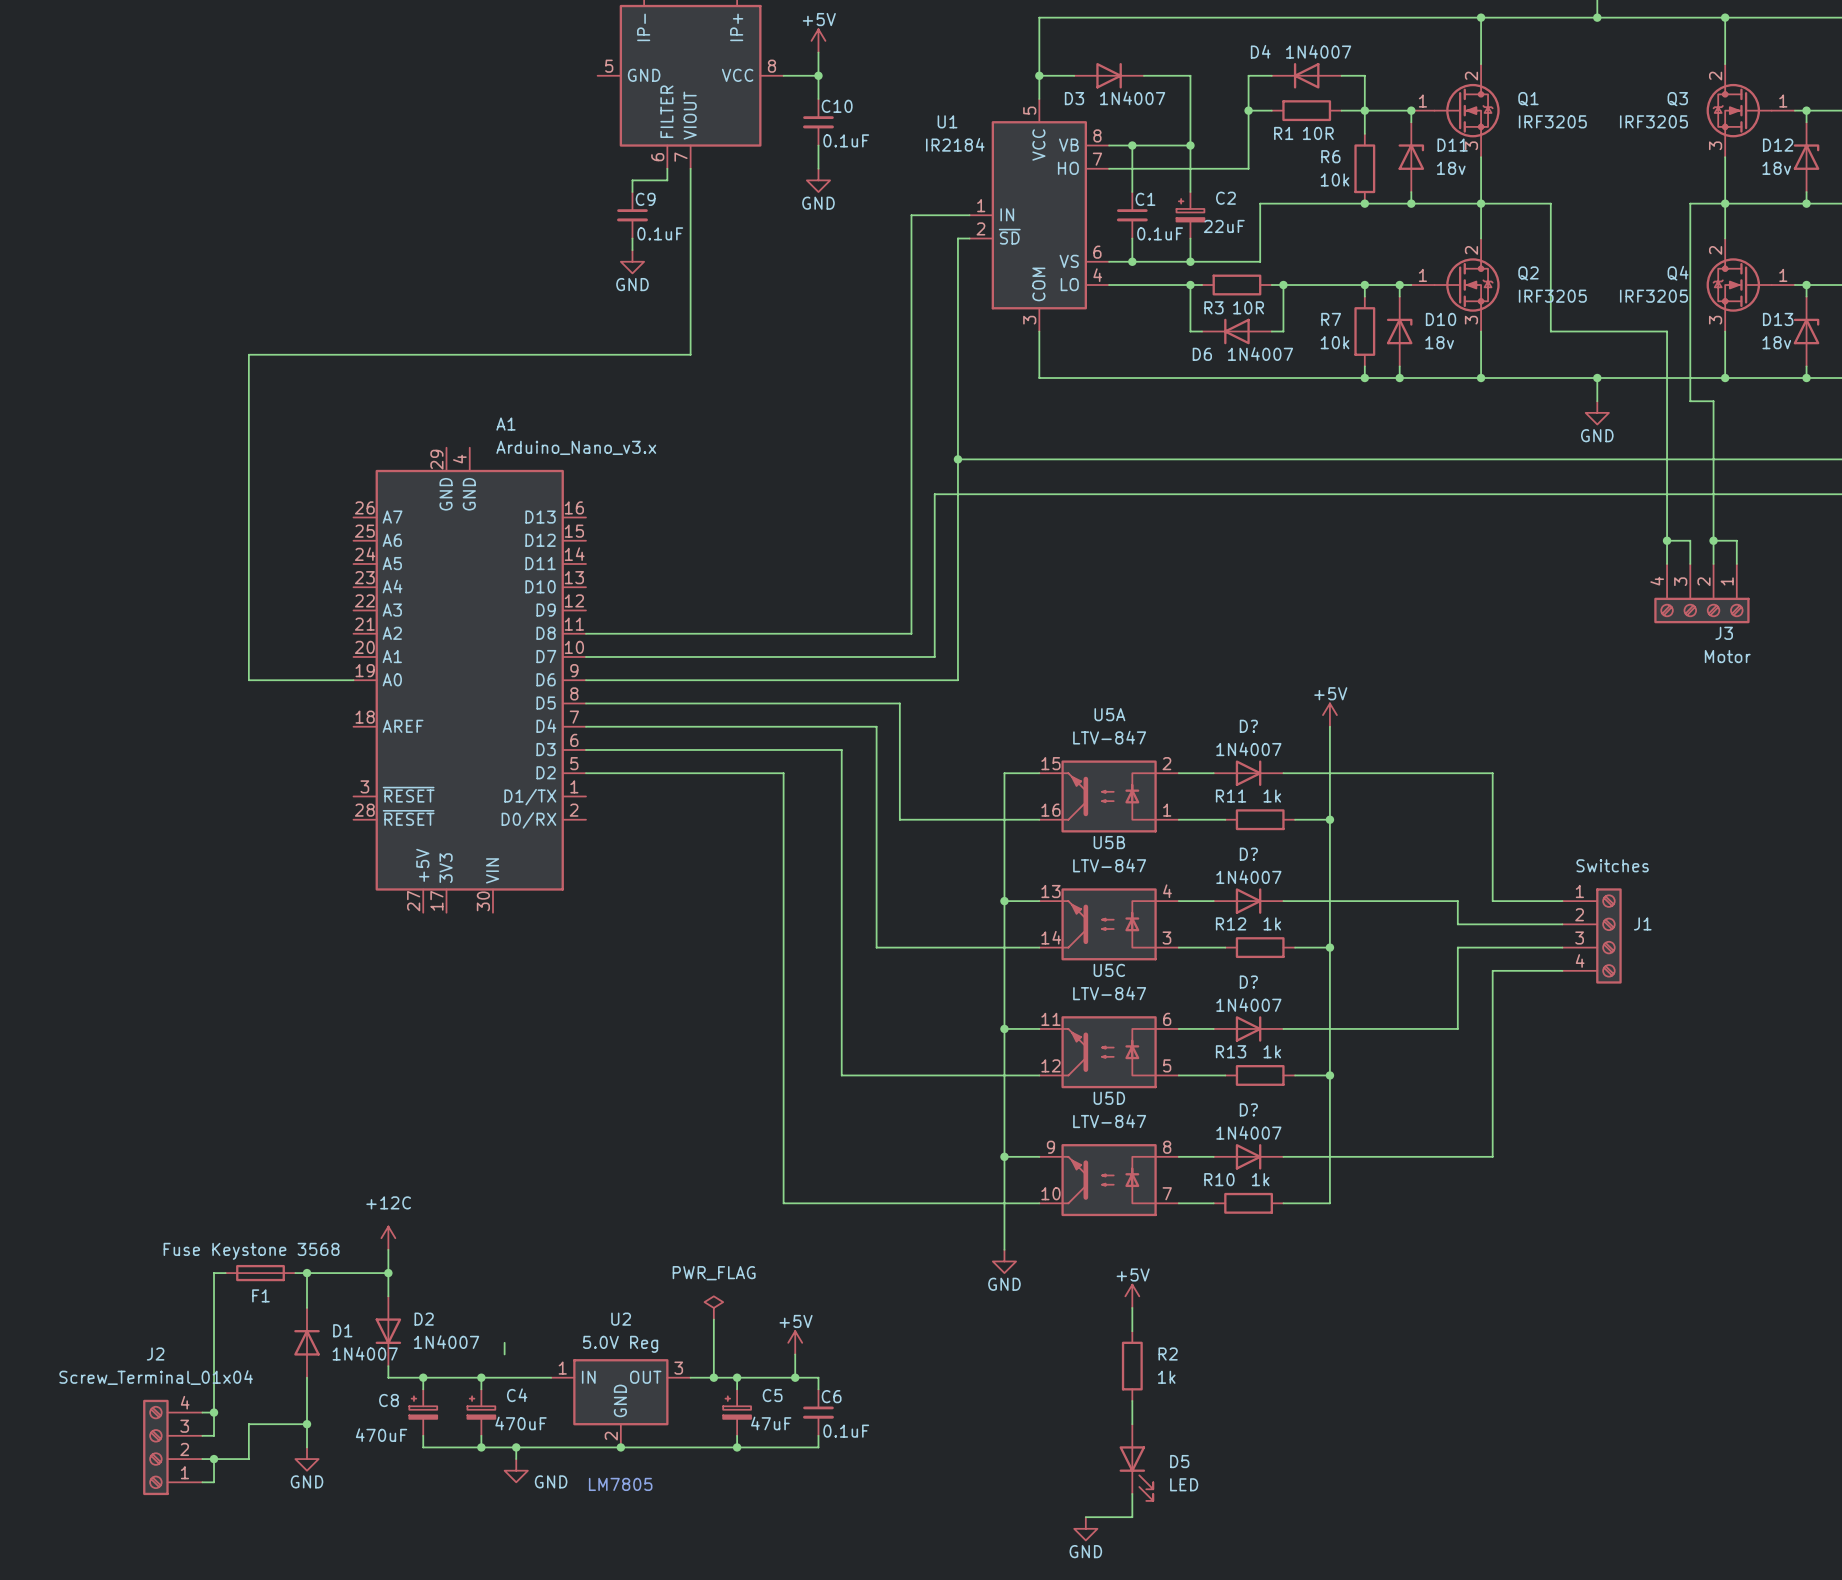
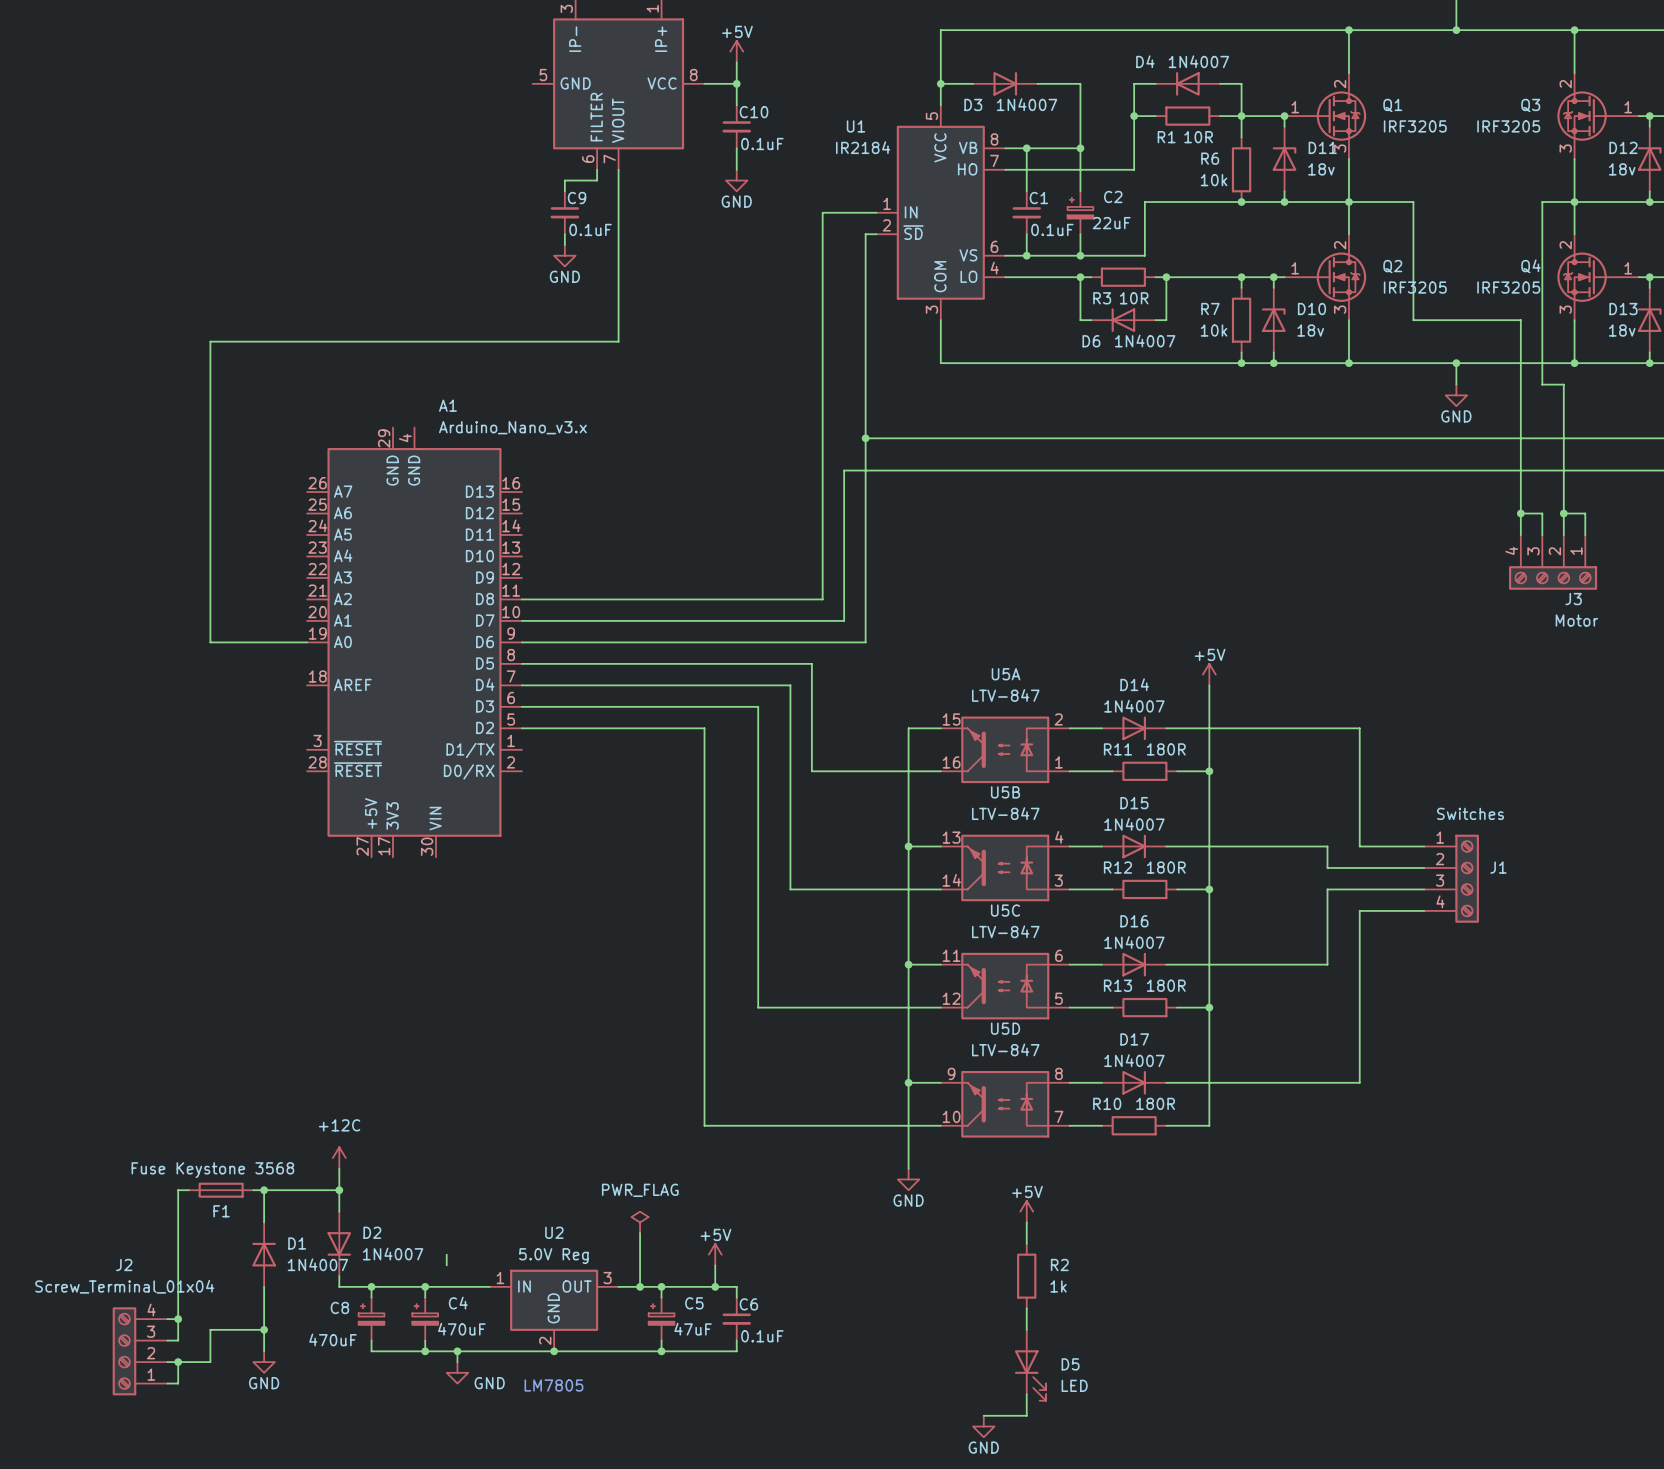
D? name: D? (1248, 726) -> D14 (1134, 684)
R11 value: 1k (1272, 796) -> 180R (1166, 749)
D? name: D? (1248, 854) -> D15 (1134, 803)
R12 value: 1k (1272, 923) -> 180R (1166, 867)
D? name: D? (1248, 982) -> D16 (1134, 921)
R13 value: 1k (1272, 1051) -> 180R (1166, 985)
D? name: D? (1248, 1109) -> D17 (1134, 1039)
R10 value: 1k (1260, 1179) -> 180R (1155, 1103)

